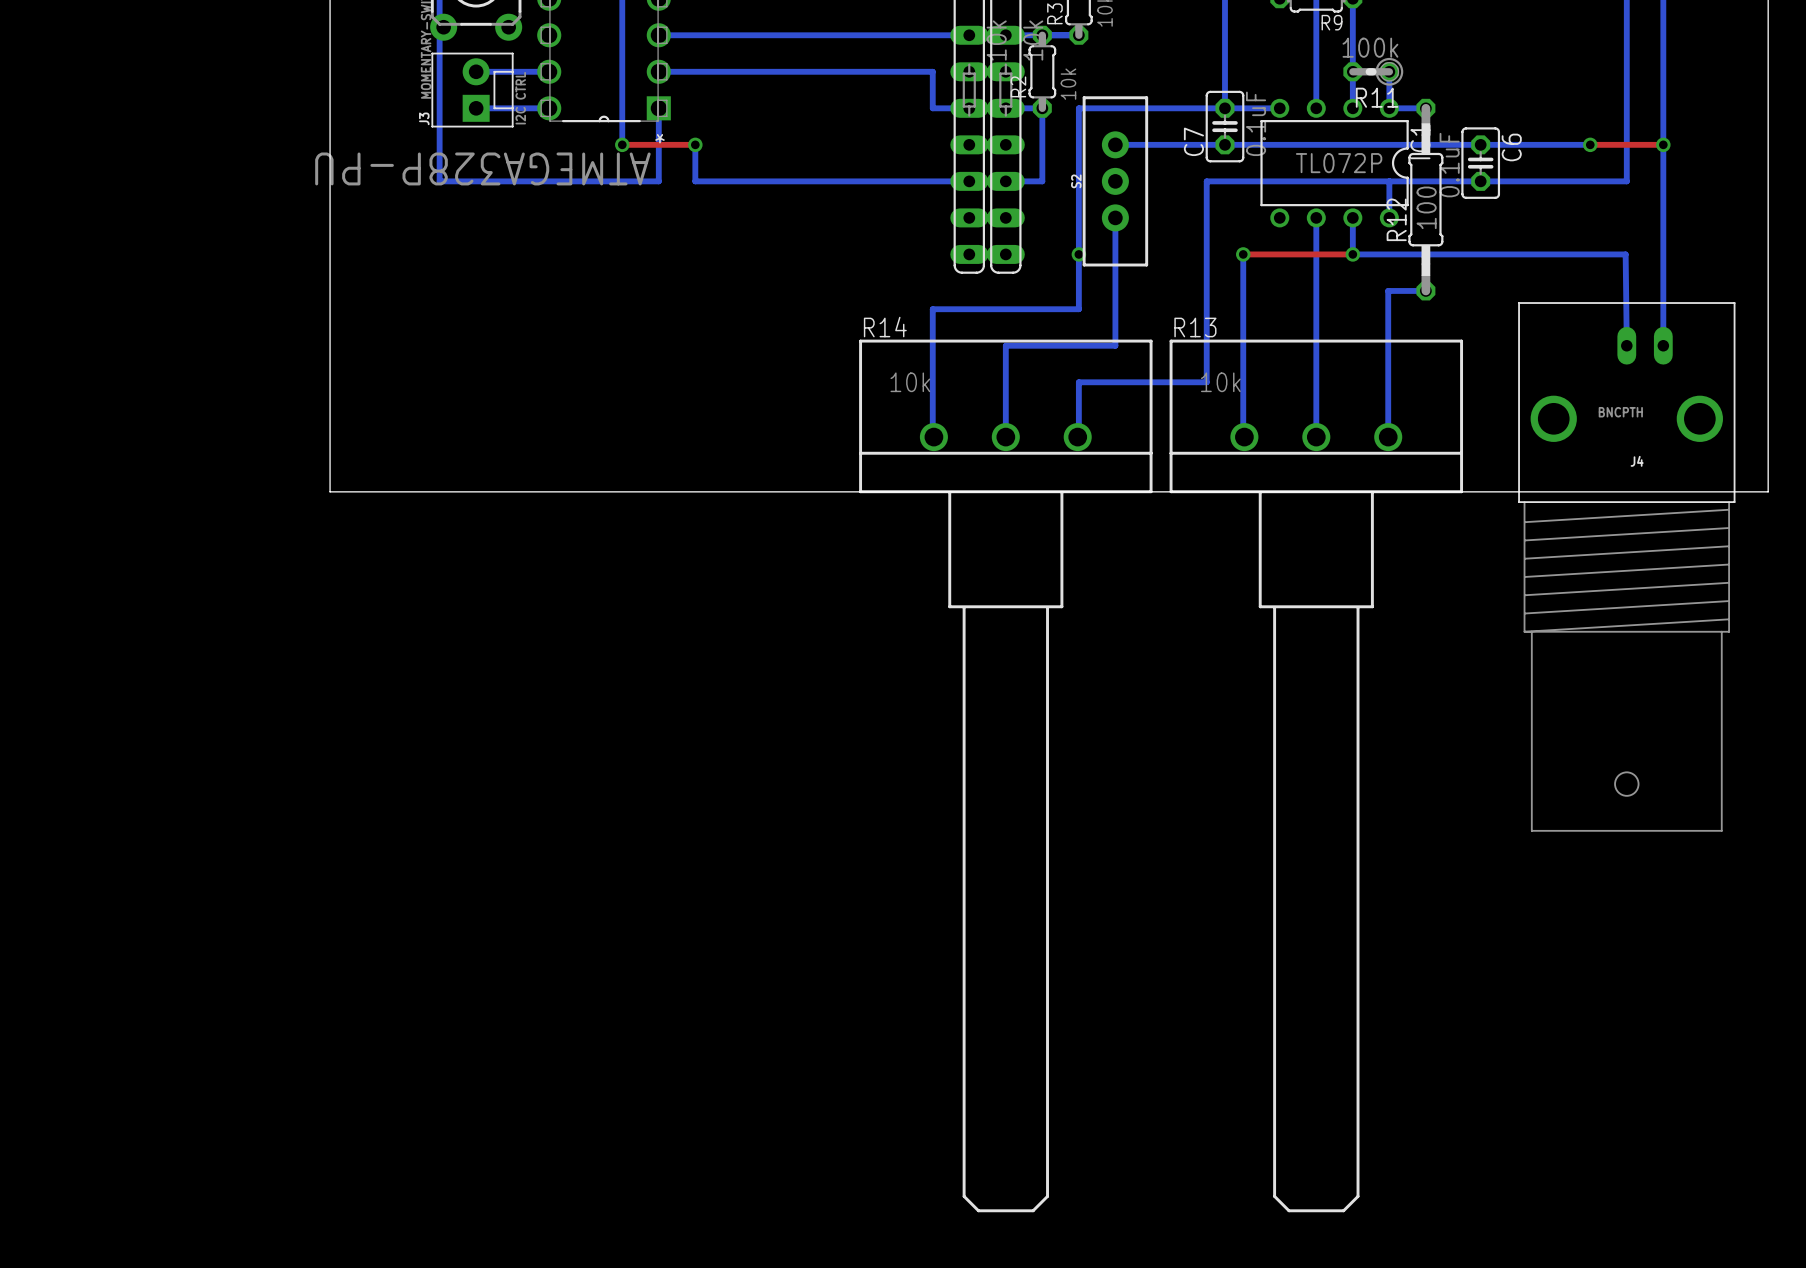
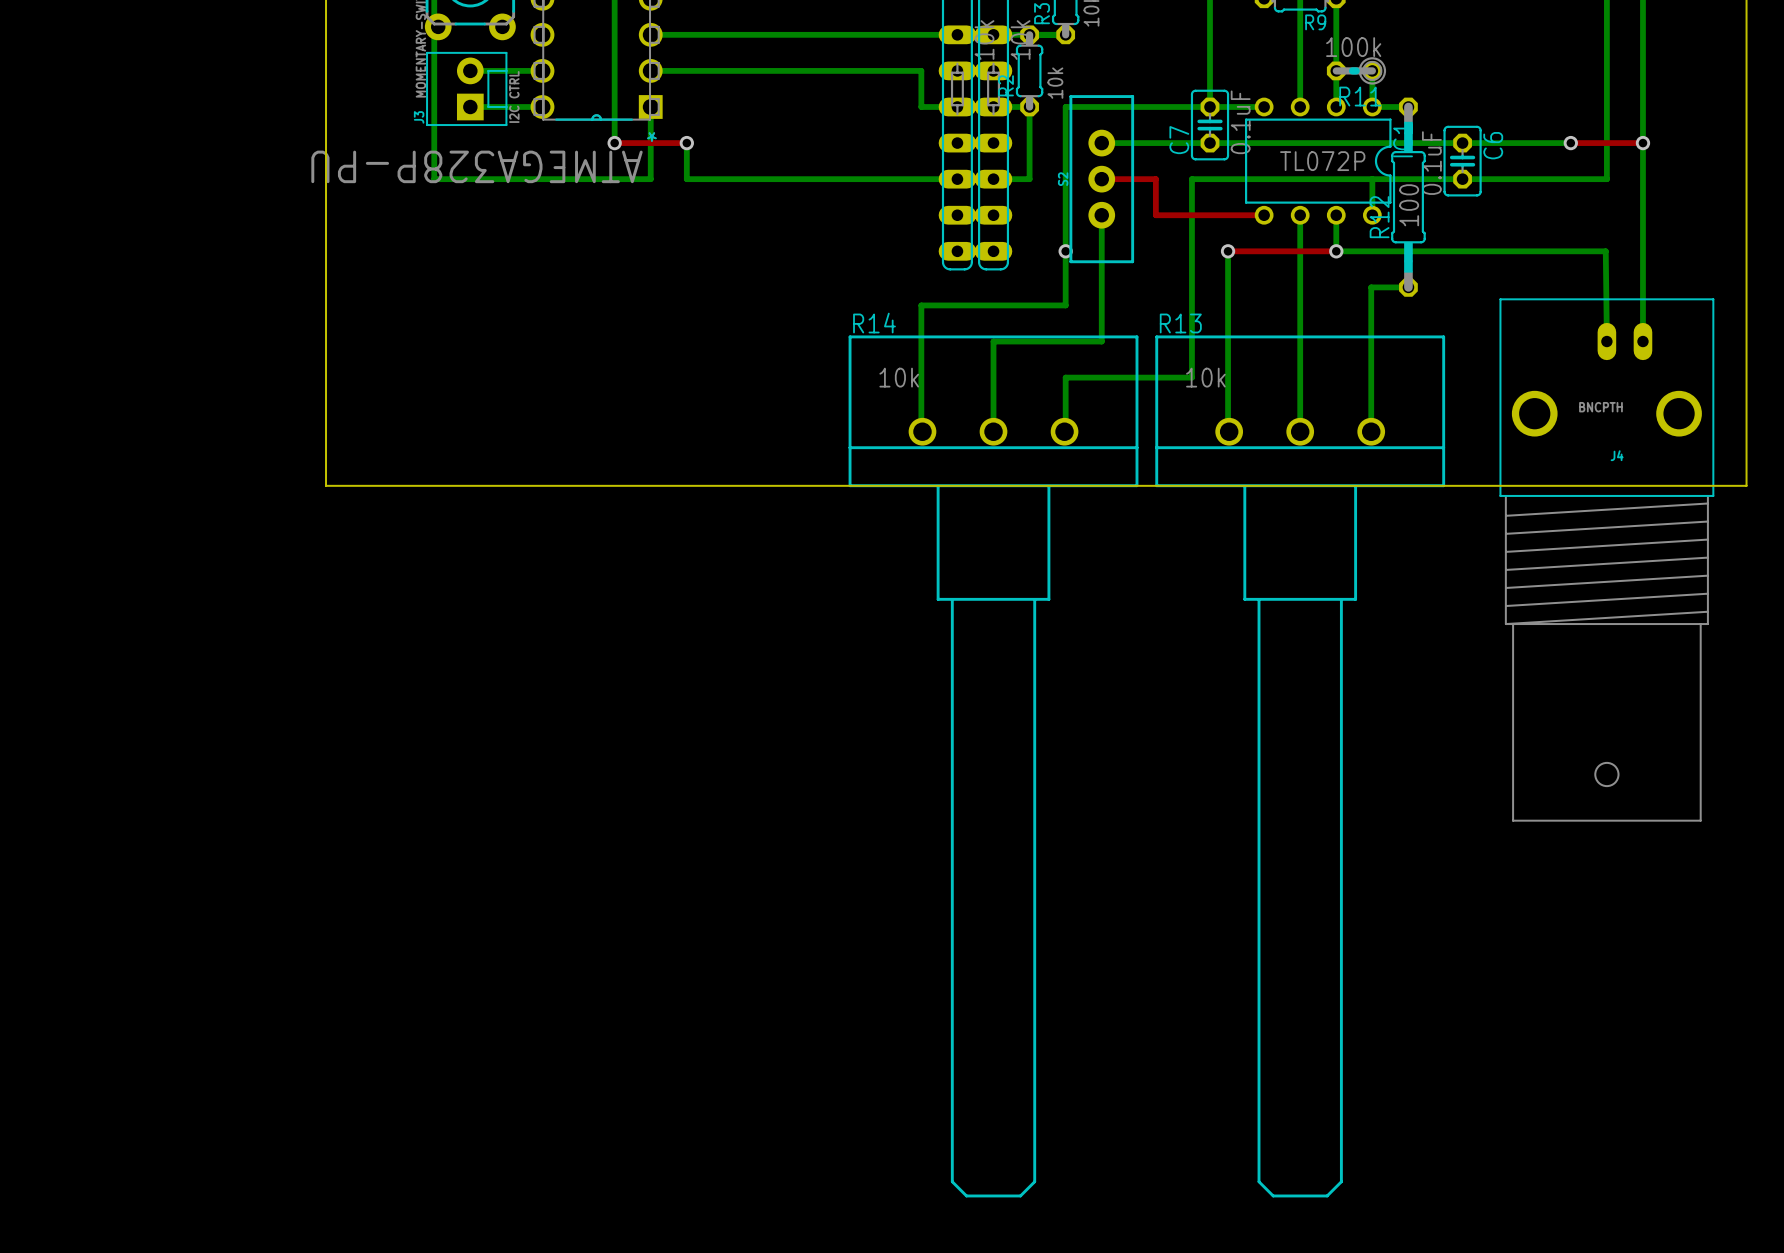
top track: none -> (1101, 179) (1155, 179) (1155, 215) (1264, 215)

